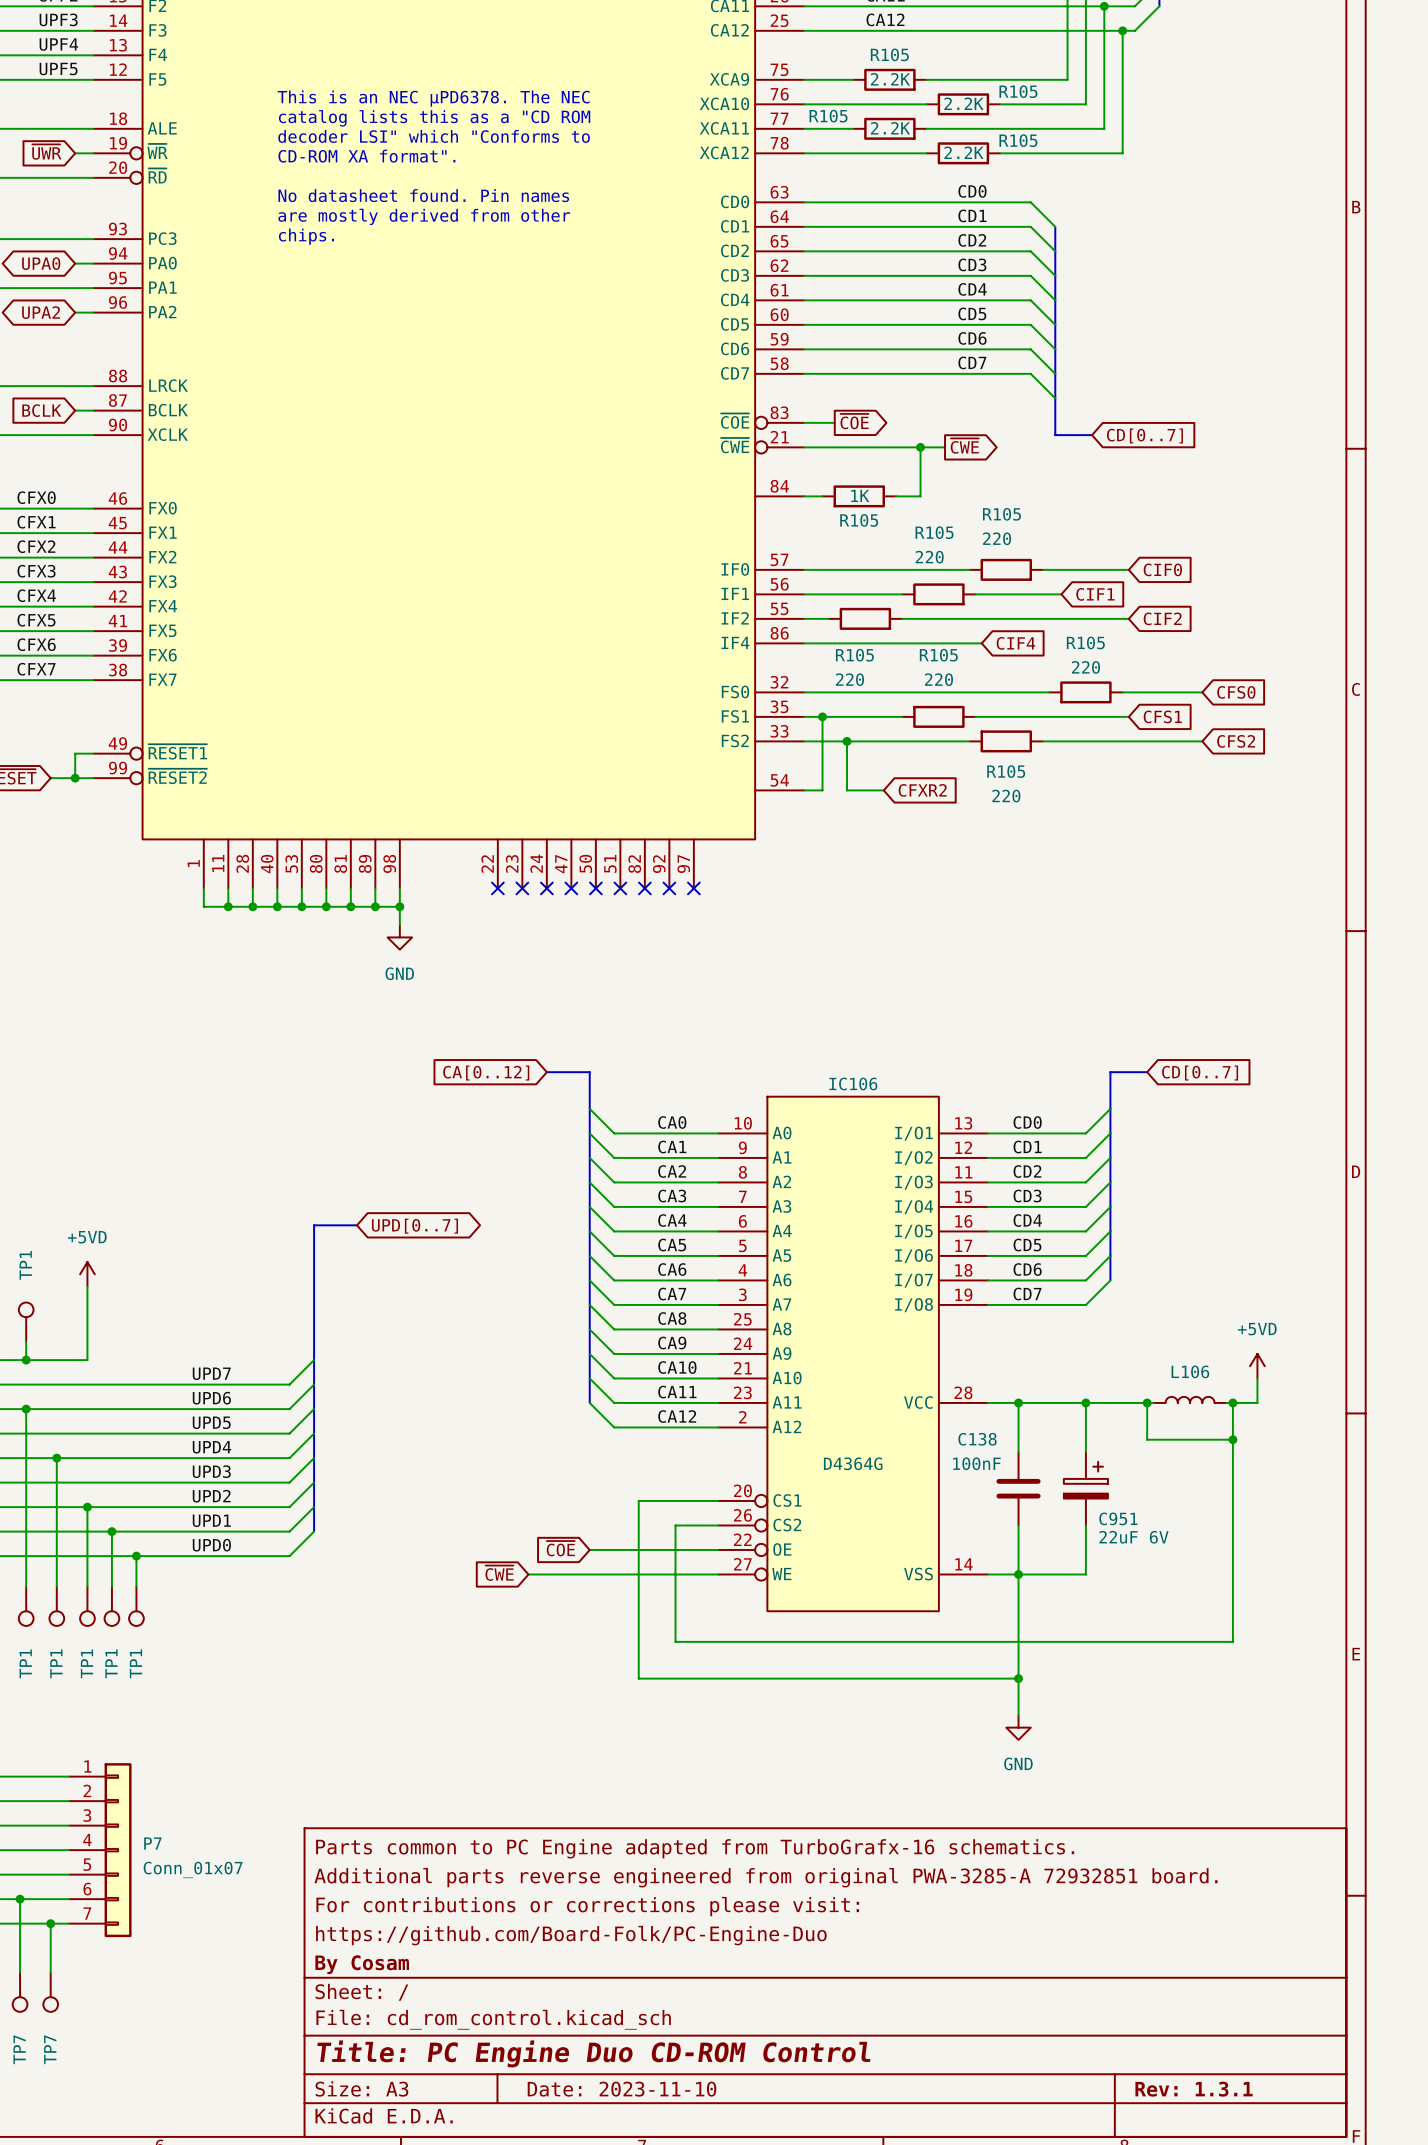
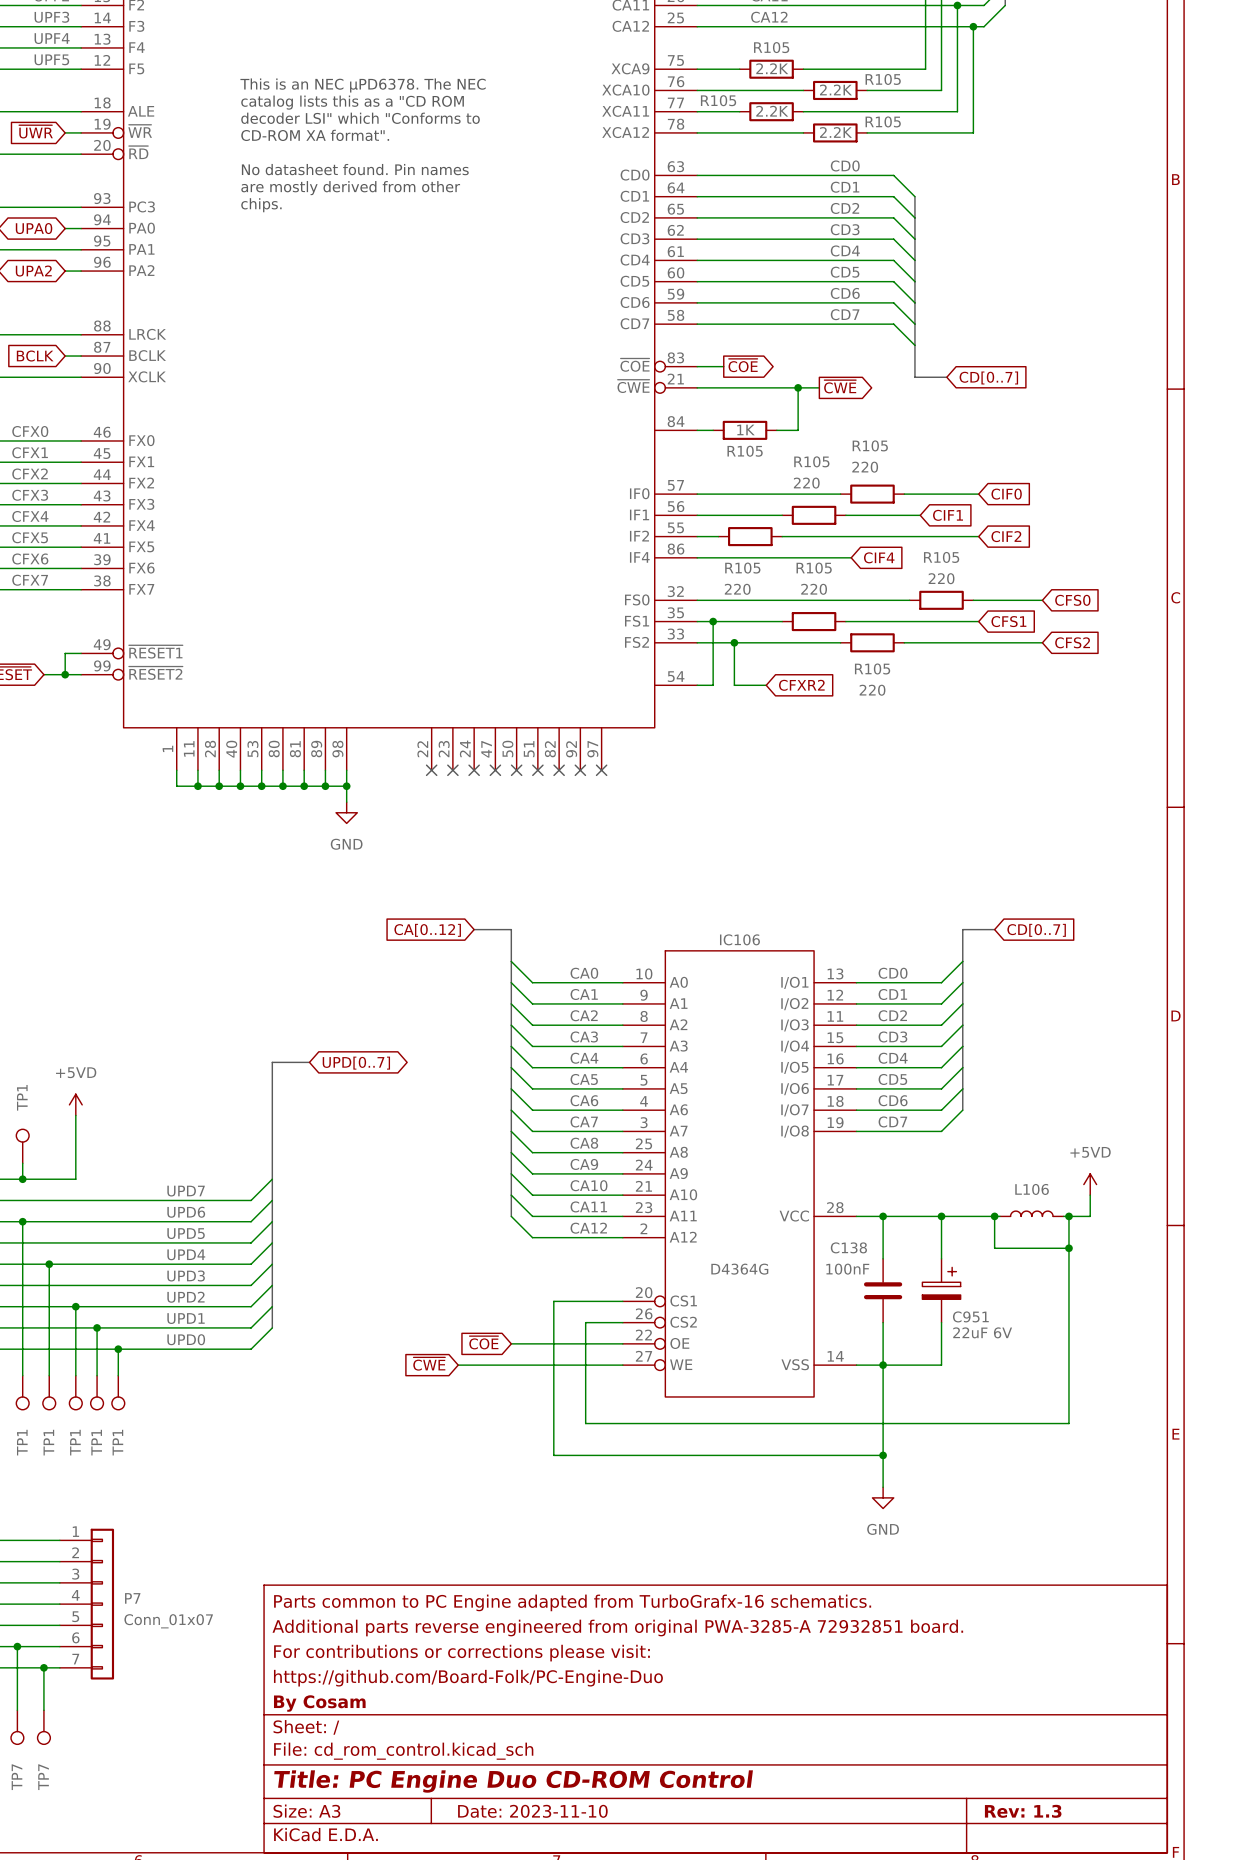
title block: Rev: 1.3.1 (1194, 2089) -> Rev: 1.3 (1023, 1811)

